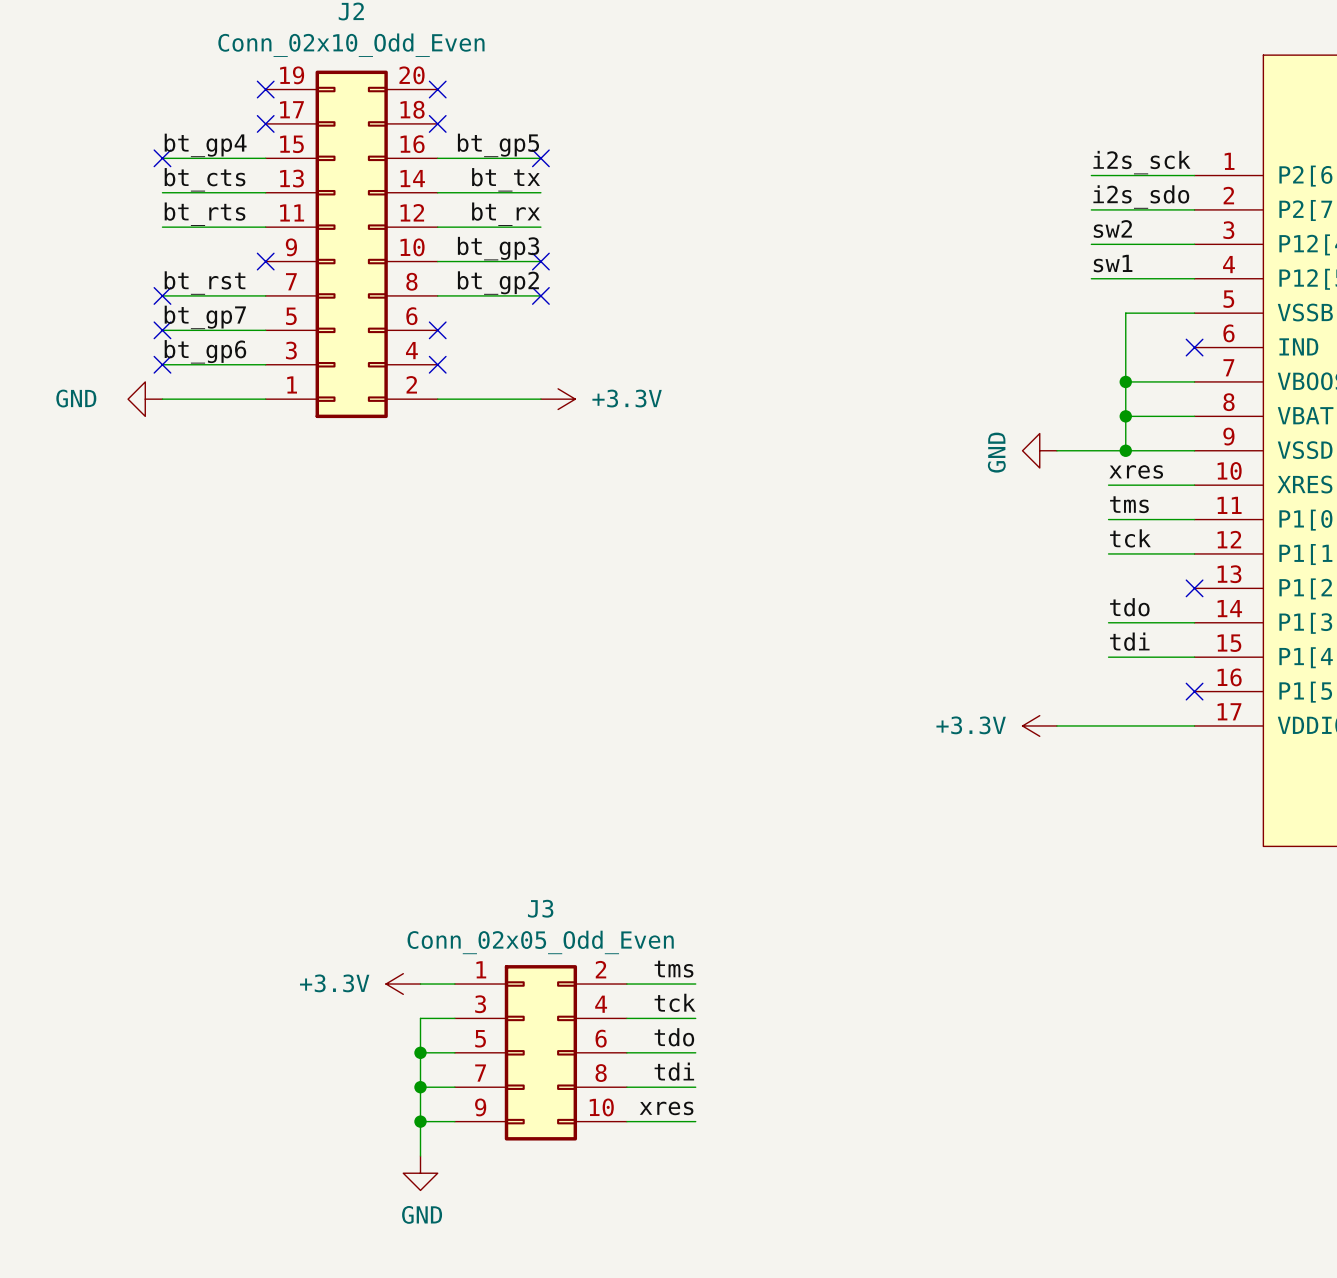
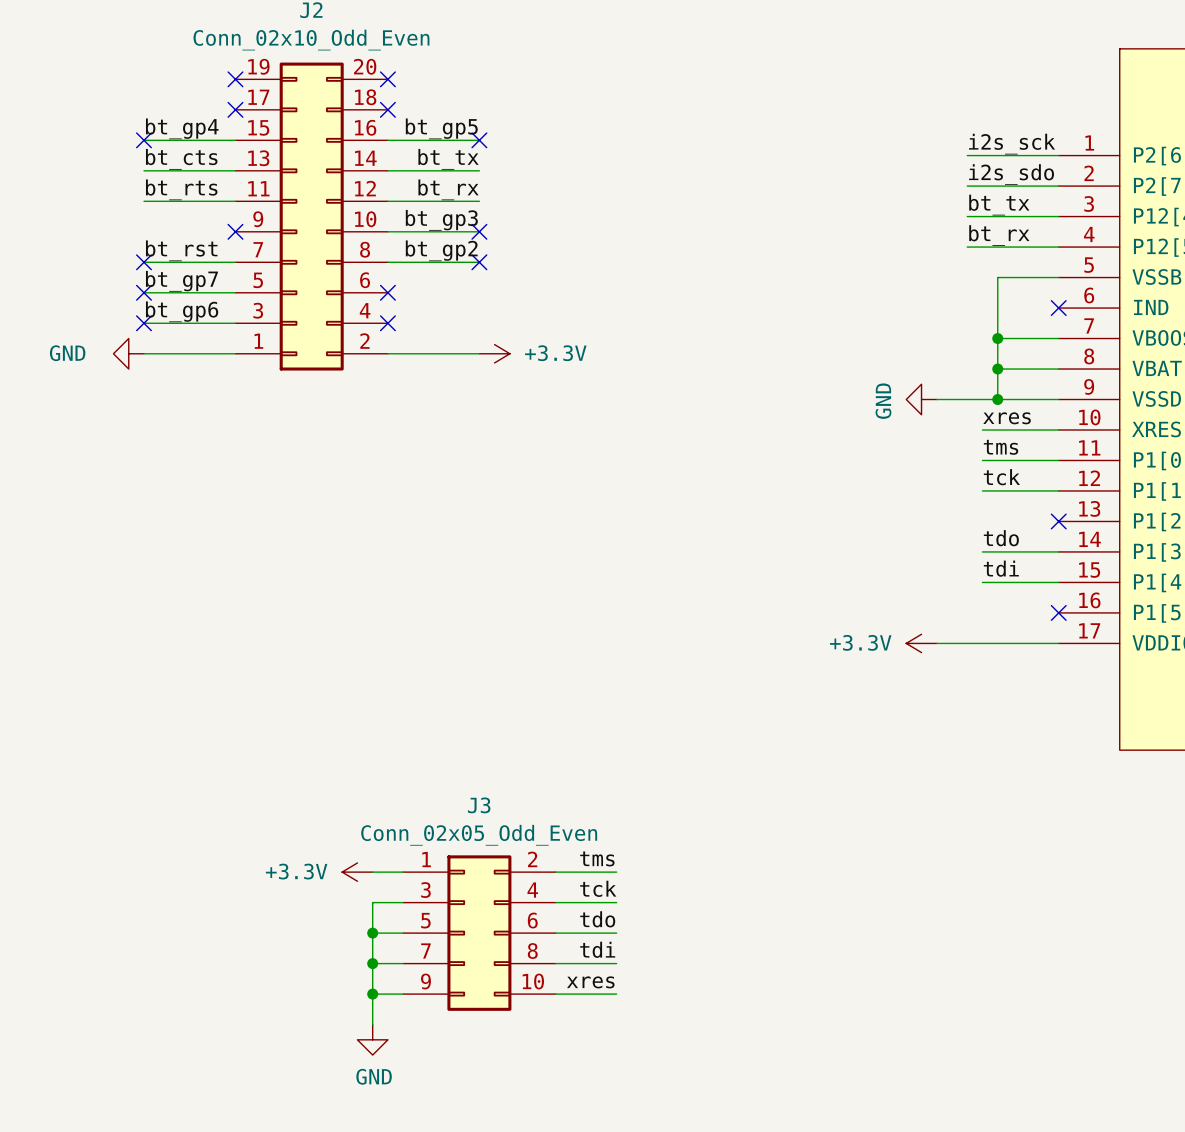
label: sw2 (1112, 229) -> bt_tx (999, 205)
label: sw1 (1113, 263) -> bt_rx (999, 235)

